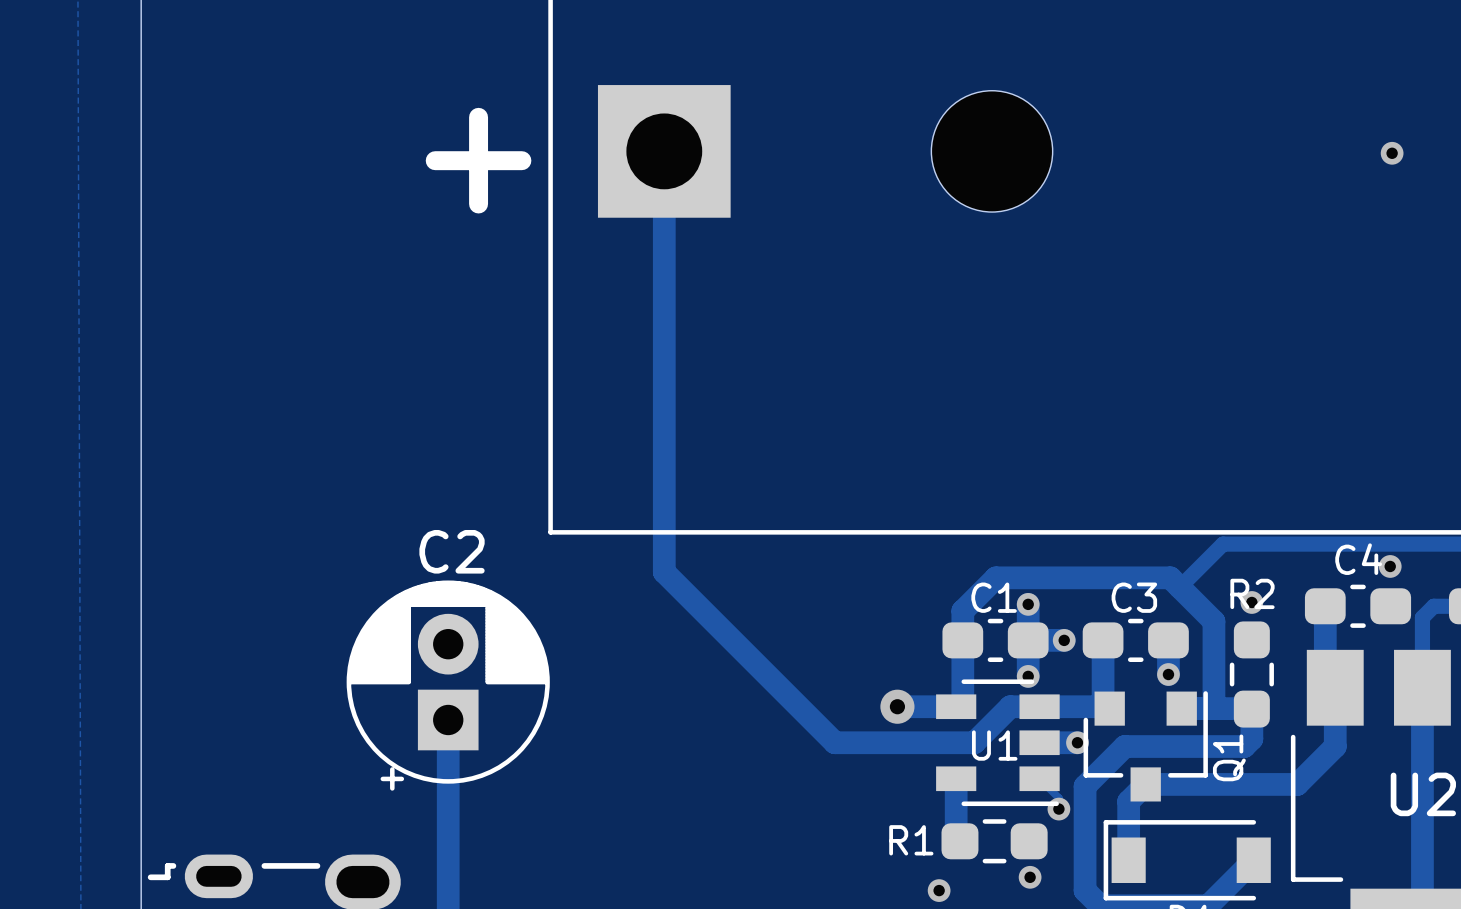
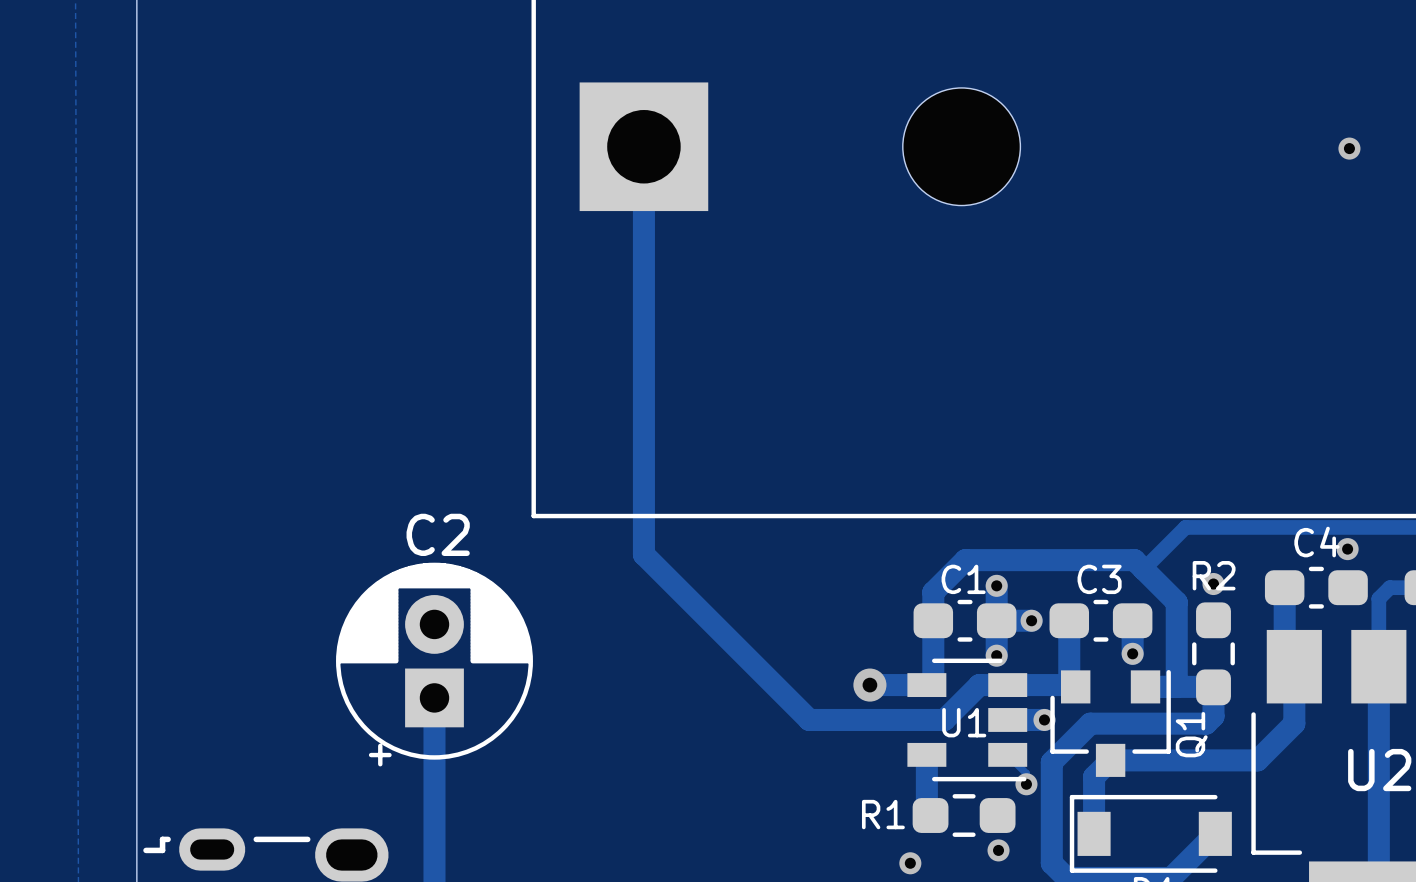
text: + (478, 160) -> none

